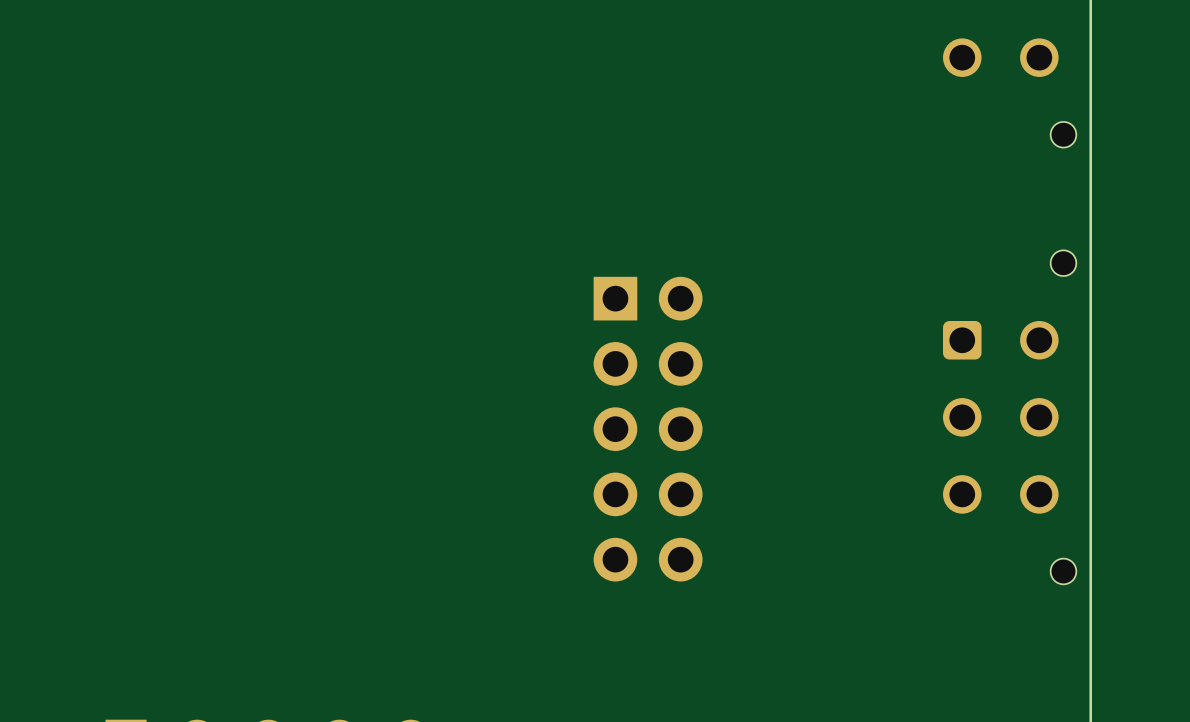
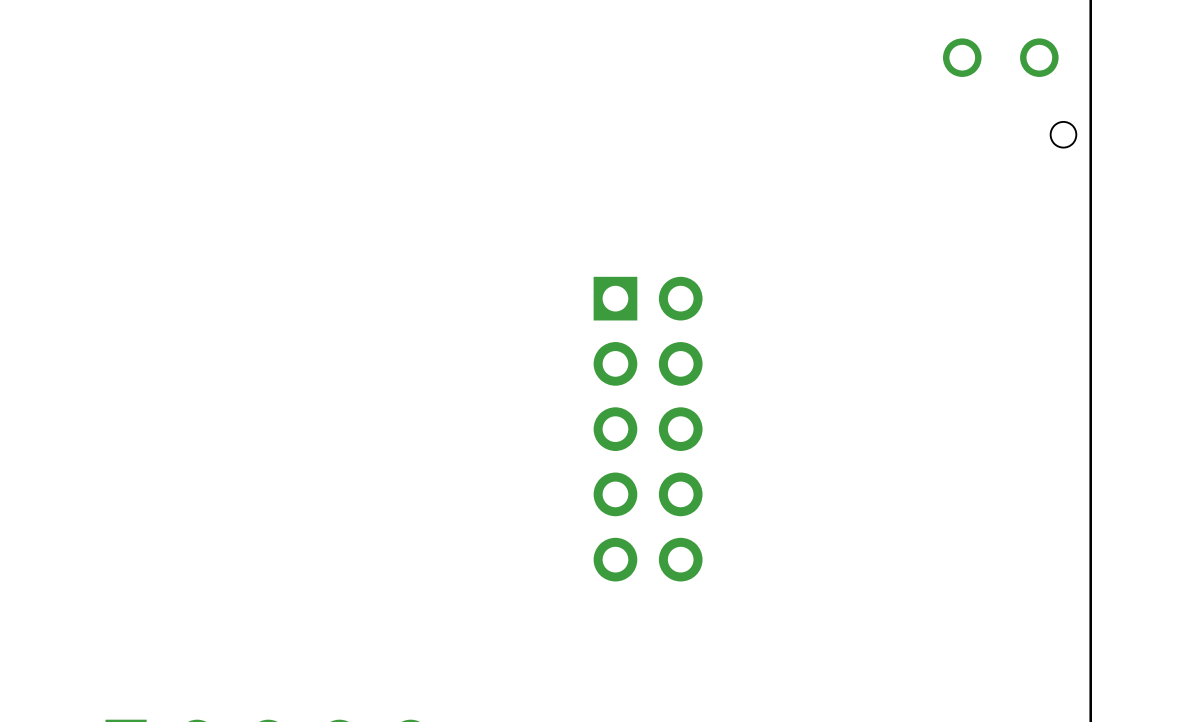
part: (1009, 417) -> none

